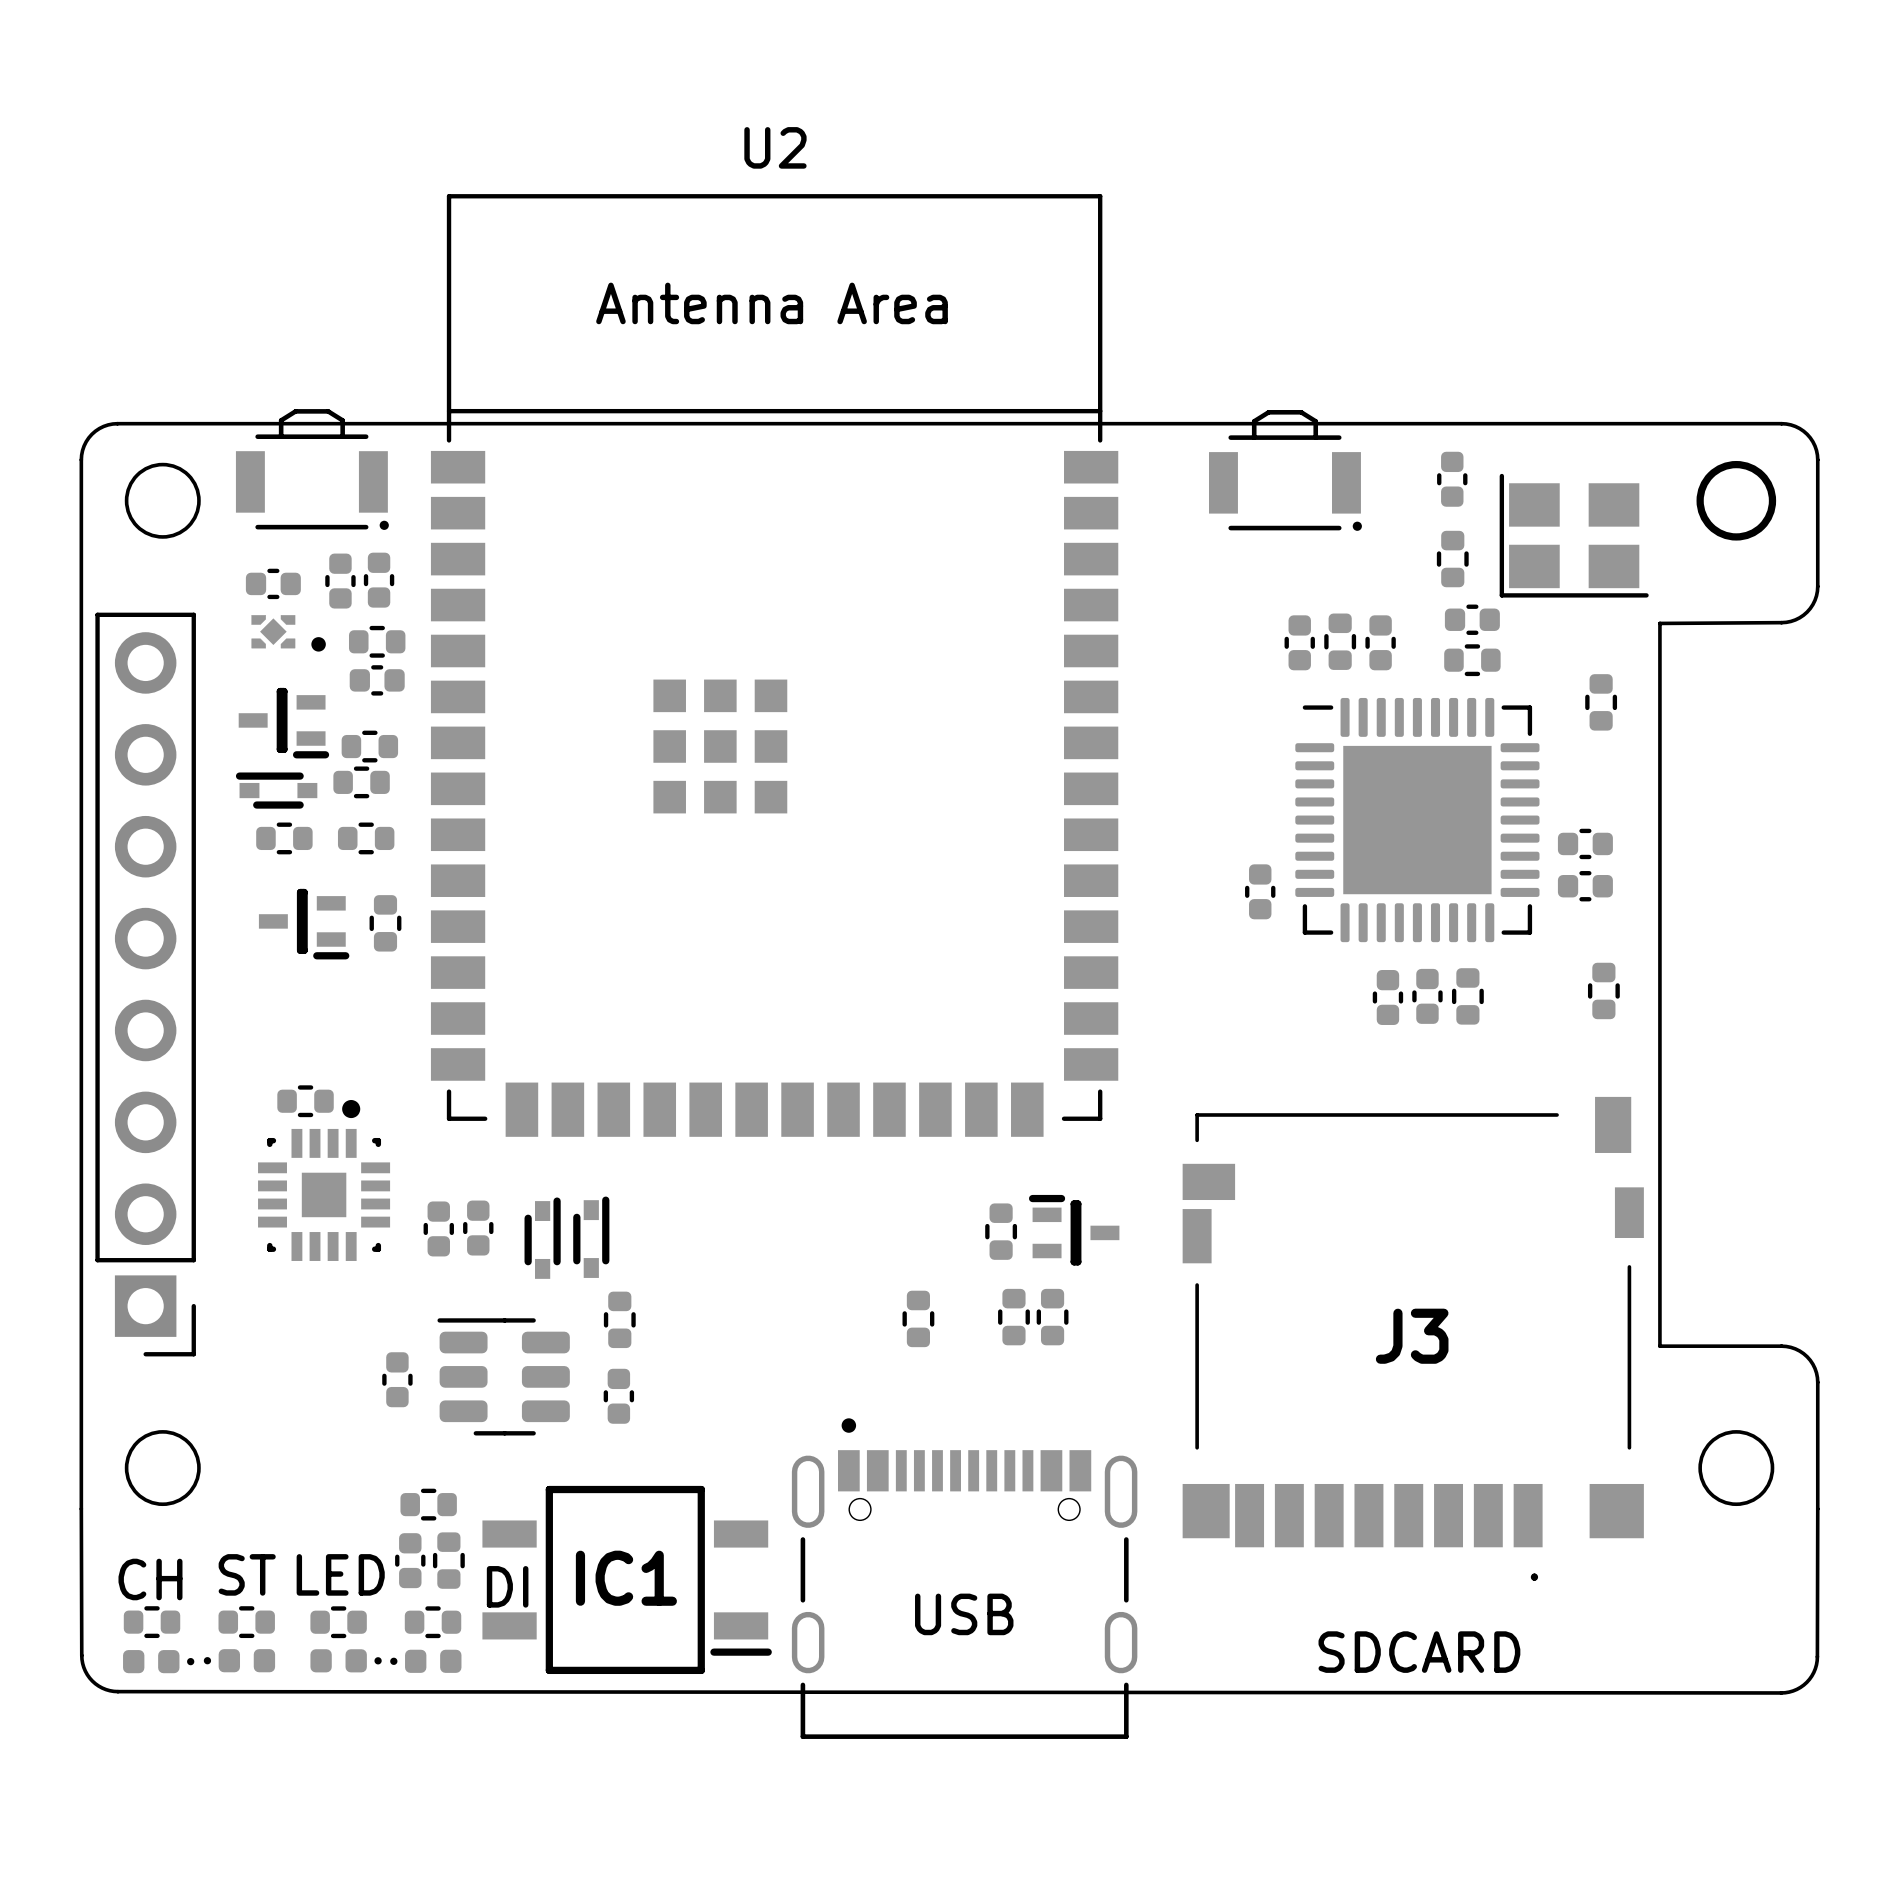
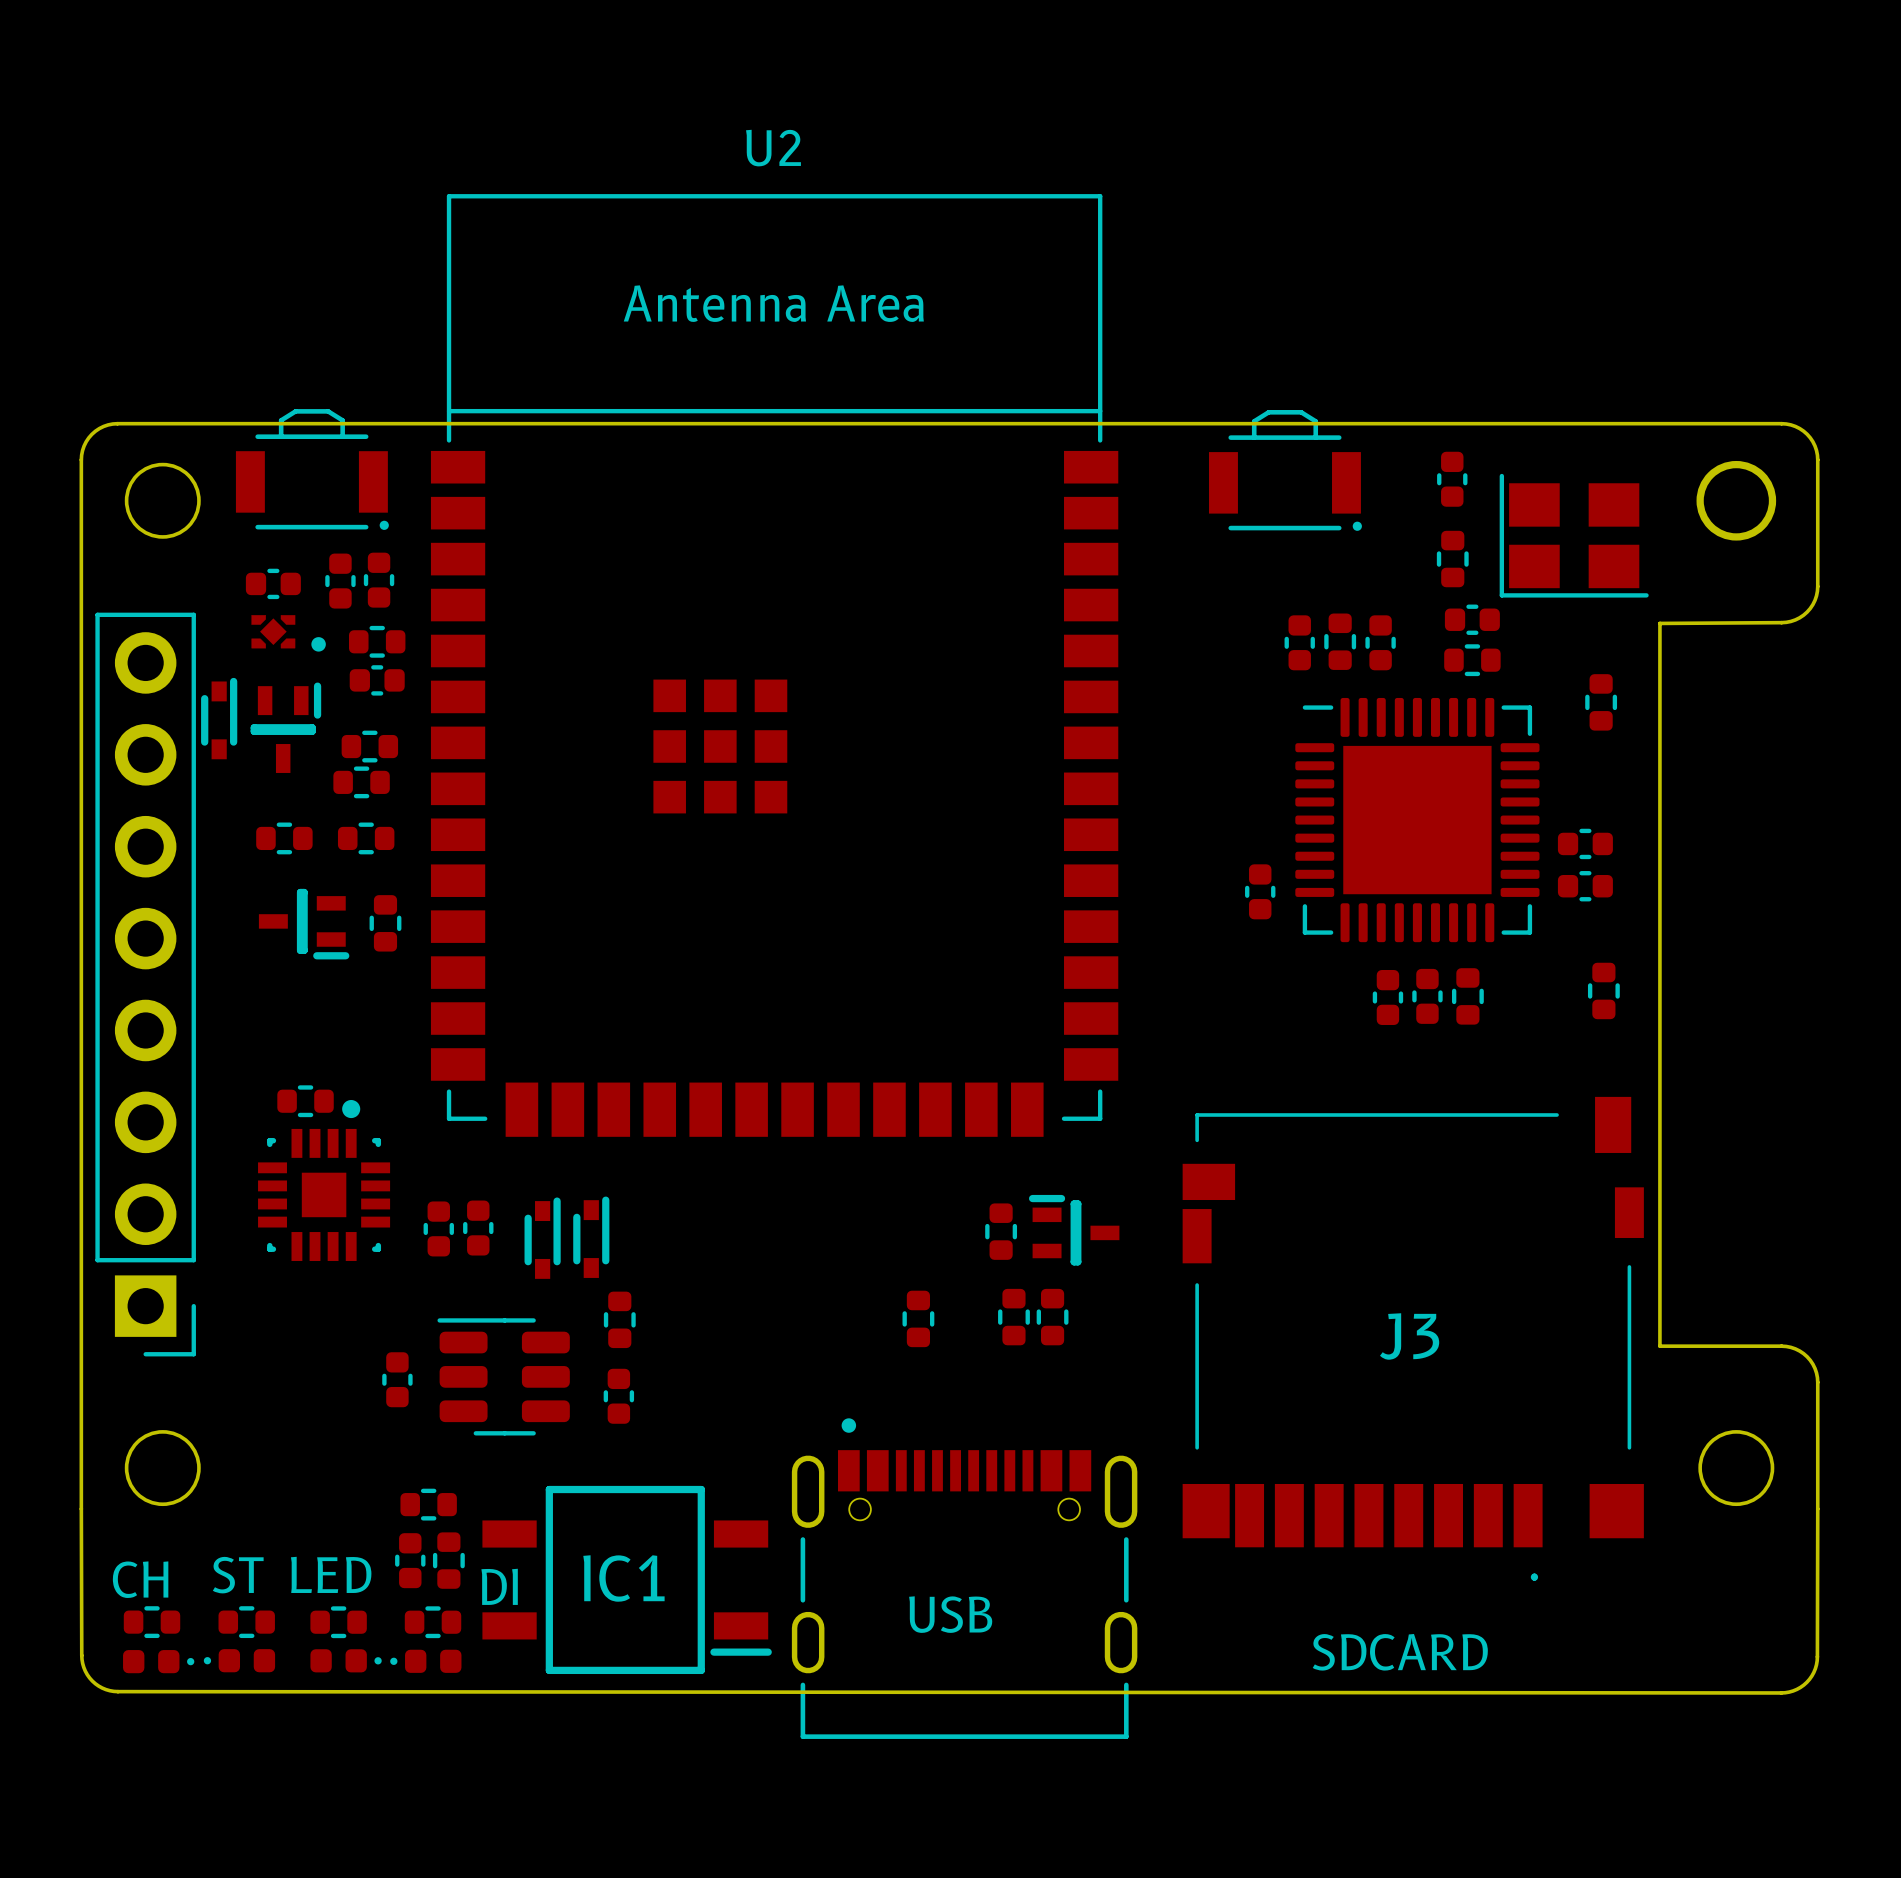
part rotation: 0° (283, 723) -> 90° counterclockwise (285, 727)
part rotation: 0° (276, 790) -> 90° clockwise (219, 718)
part position: (276, 790) -> (219, 718)

